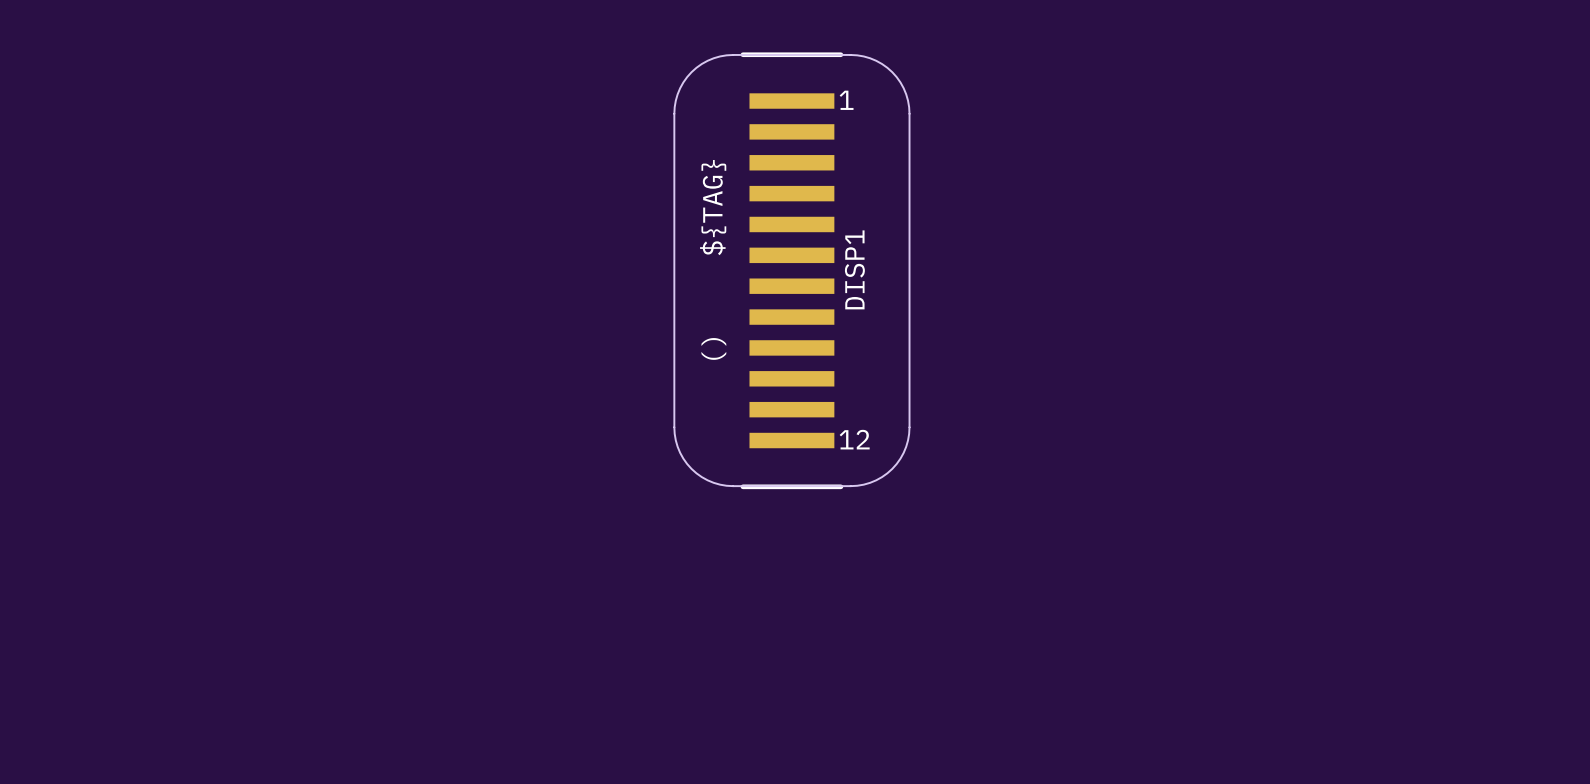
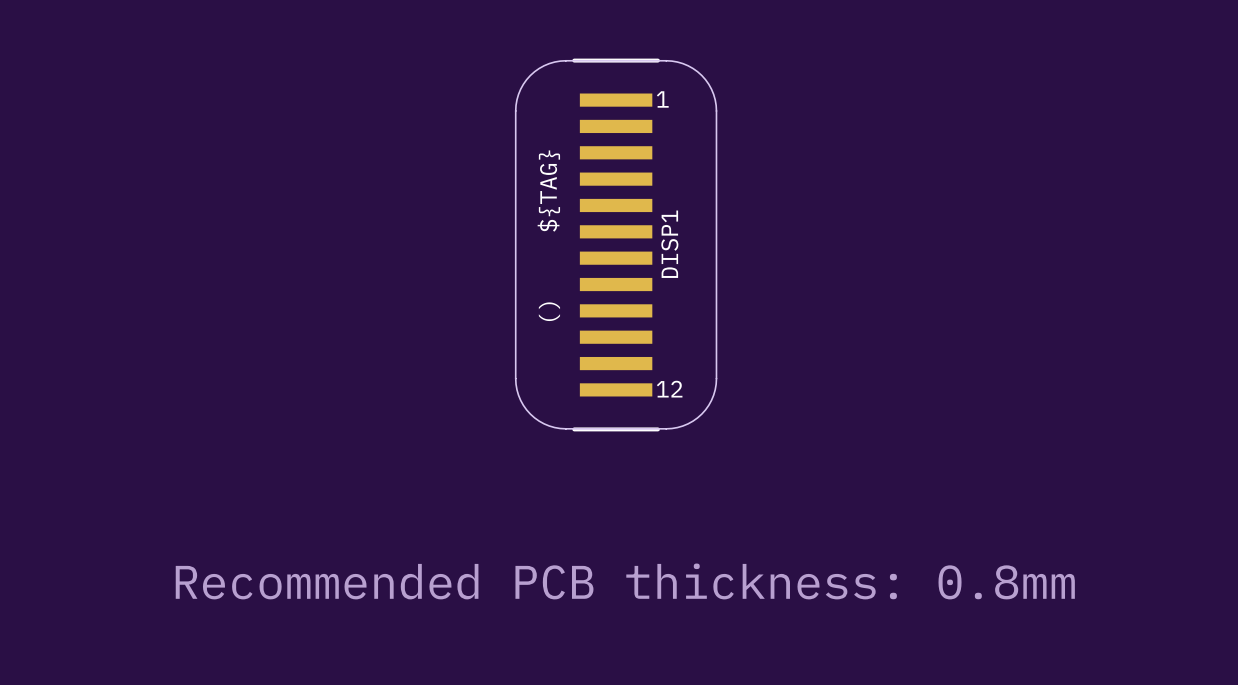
text: none -> Recommended PCB thickness: 0.8mm (625, 581)

